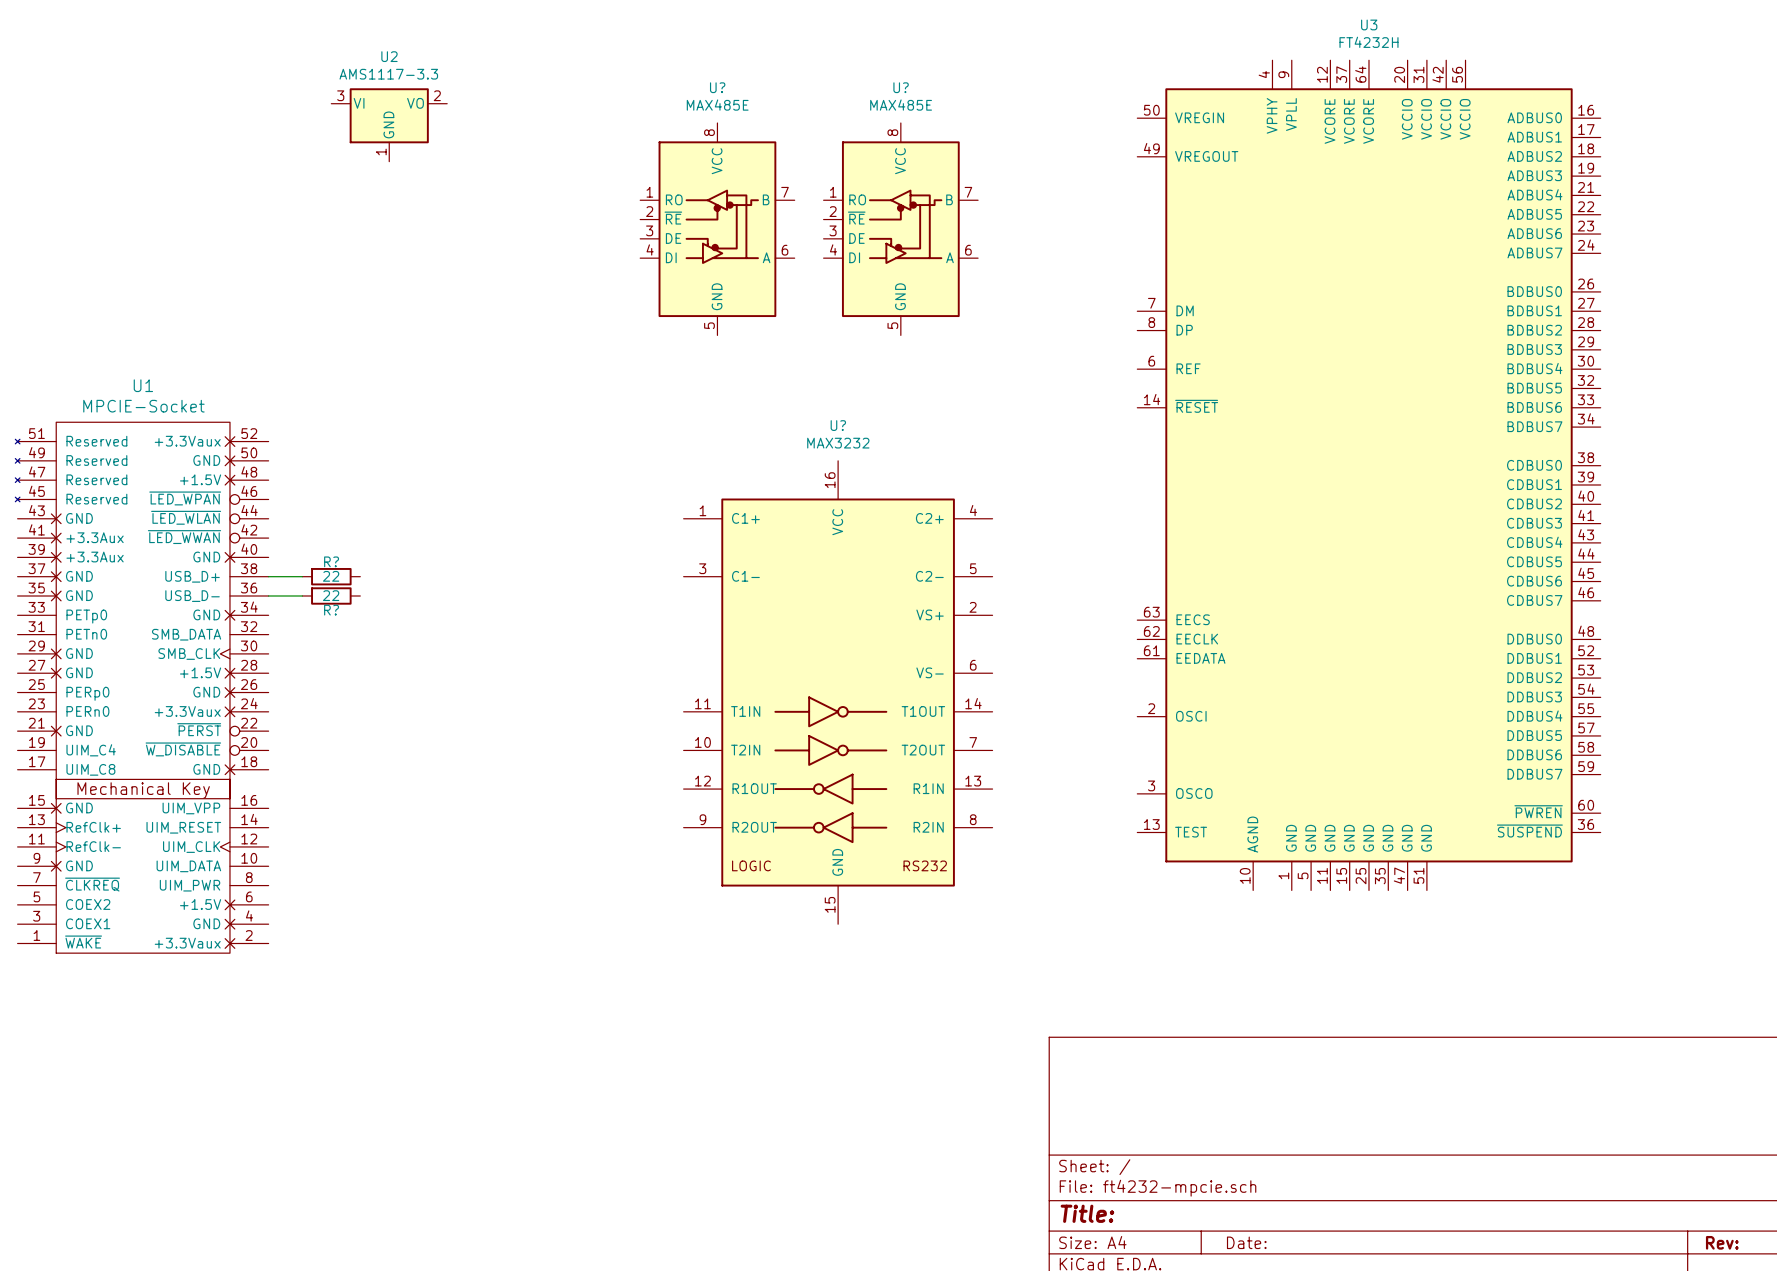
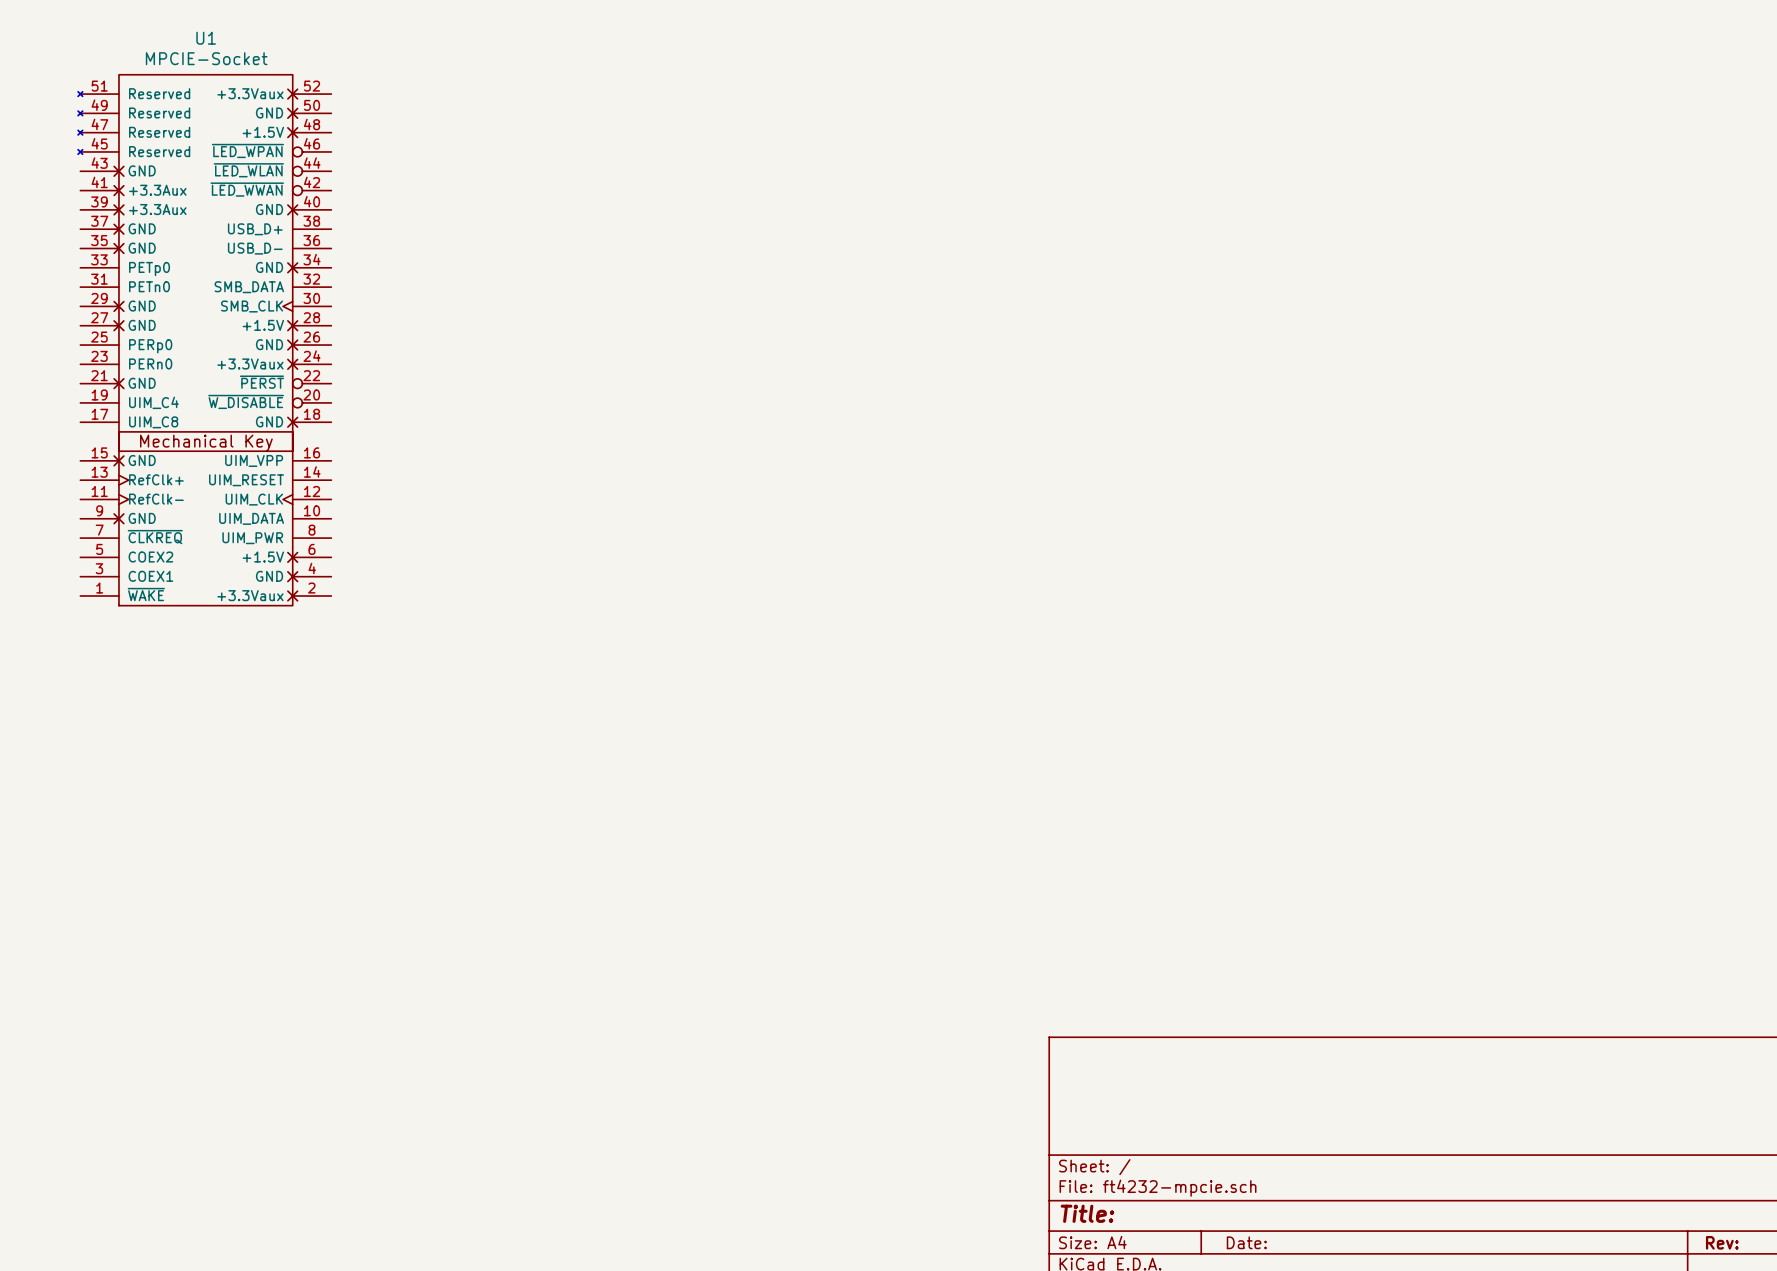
U2: AMS1117-3.3 (389, 124) -> none
U?: MAX485E (717, 229) -> none
U?: MAX485E (900, 229) -> none
U3: FT4232H (1368, 475) -> none
wire: (268, 576) (302, 576) -> none
R?: 22 (331, 576) -> none
wire: (268, 596) (302, 596) -> none
R?: 22 (331, 596) -> none
U1 position: (141, 687) -> (204, 340)
U?: MAX3232 (838, 692) -> none

